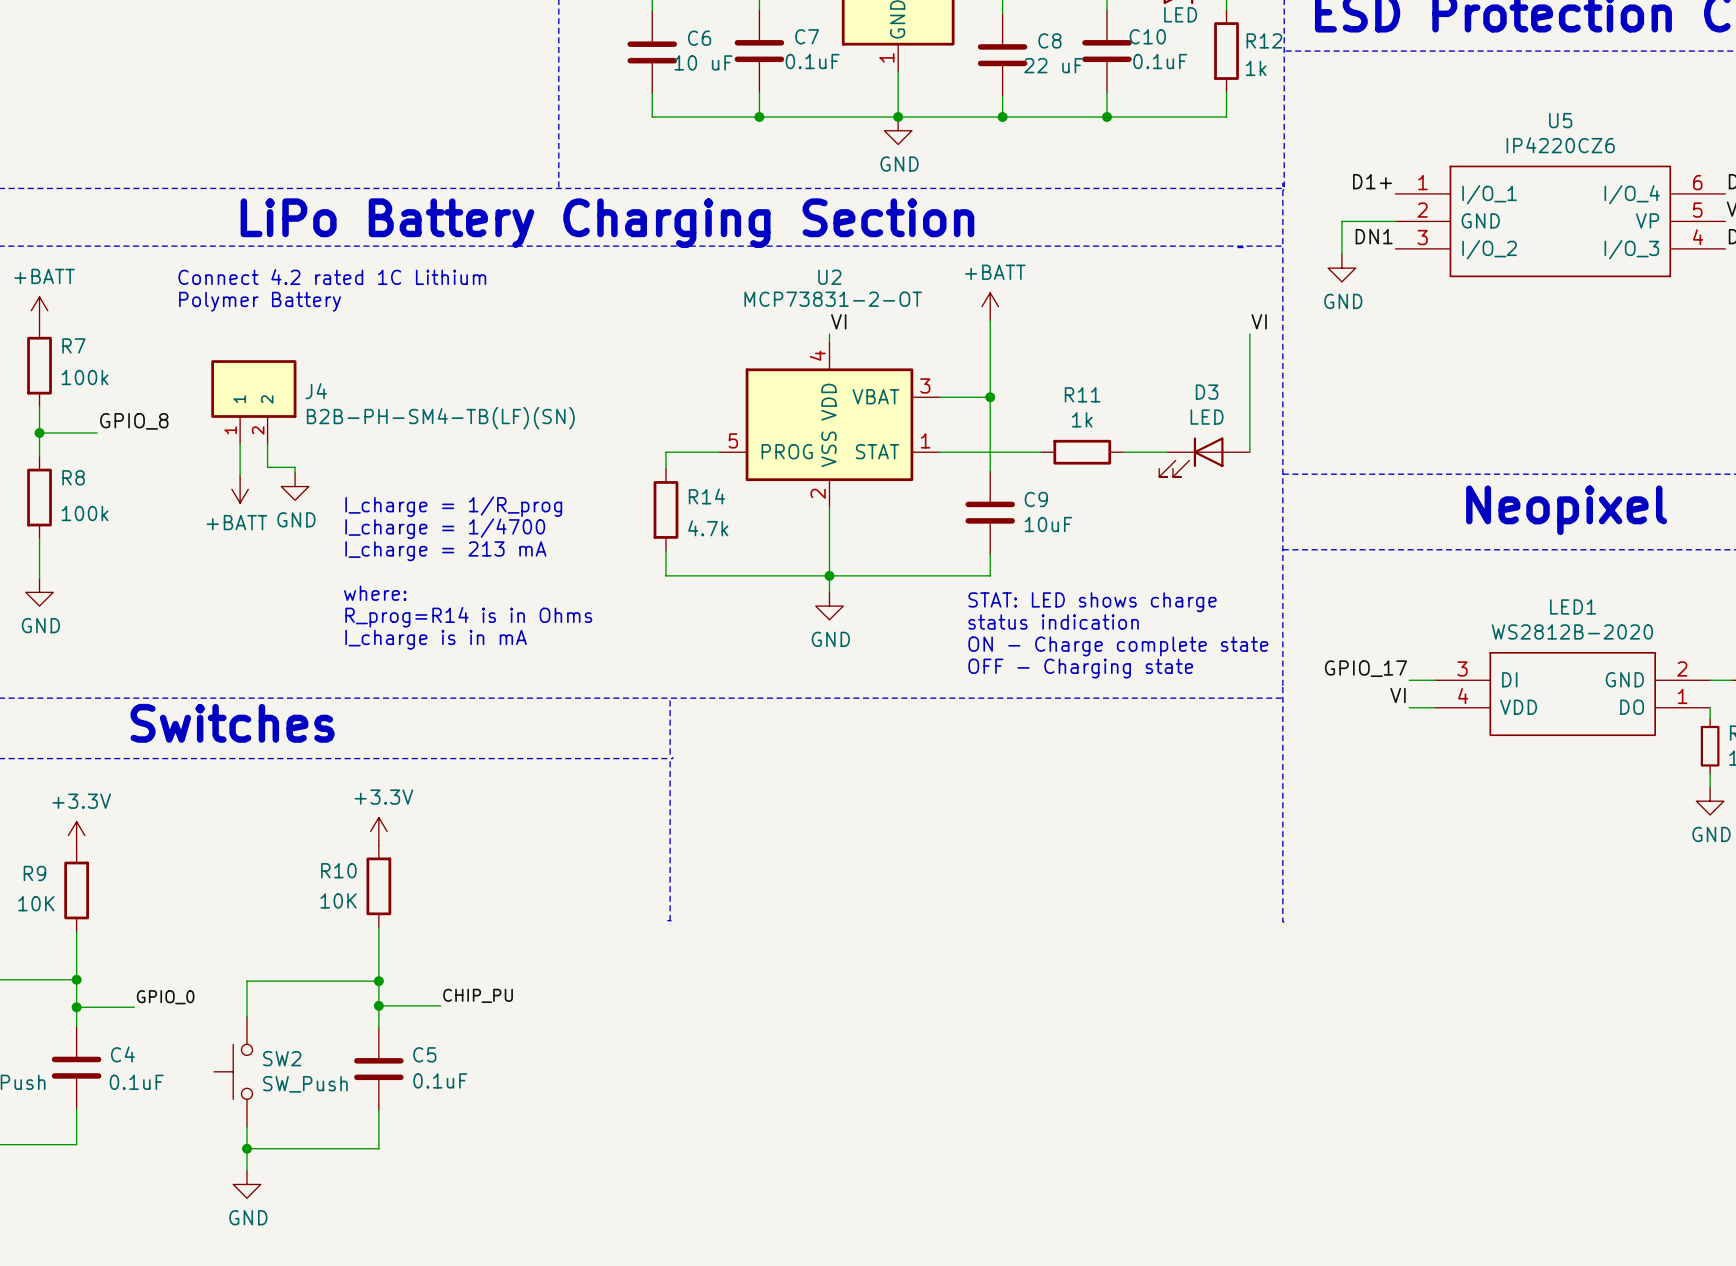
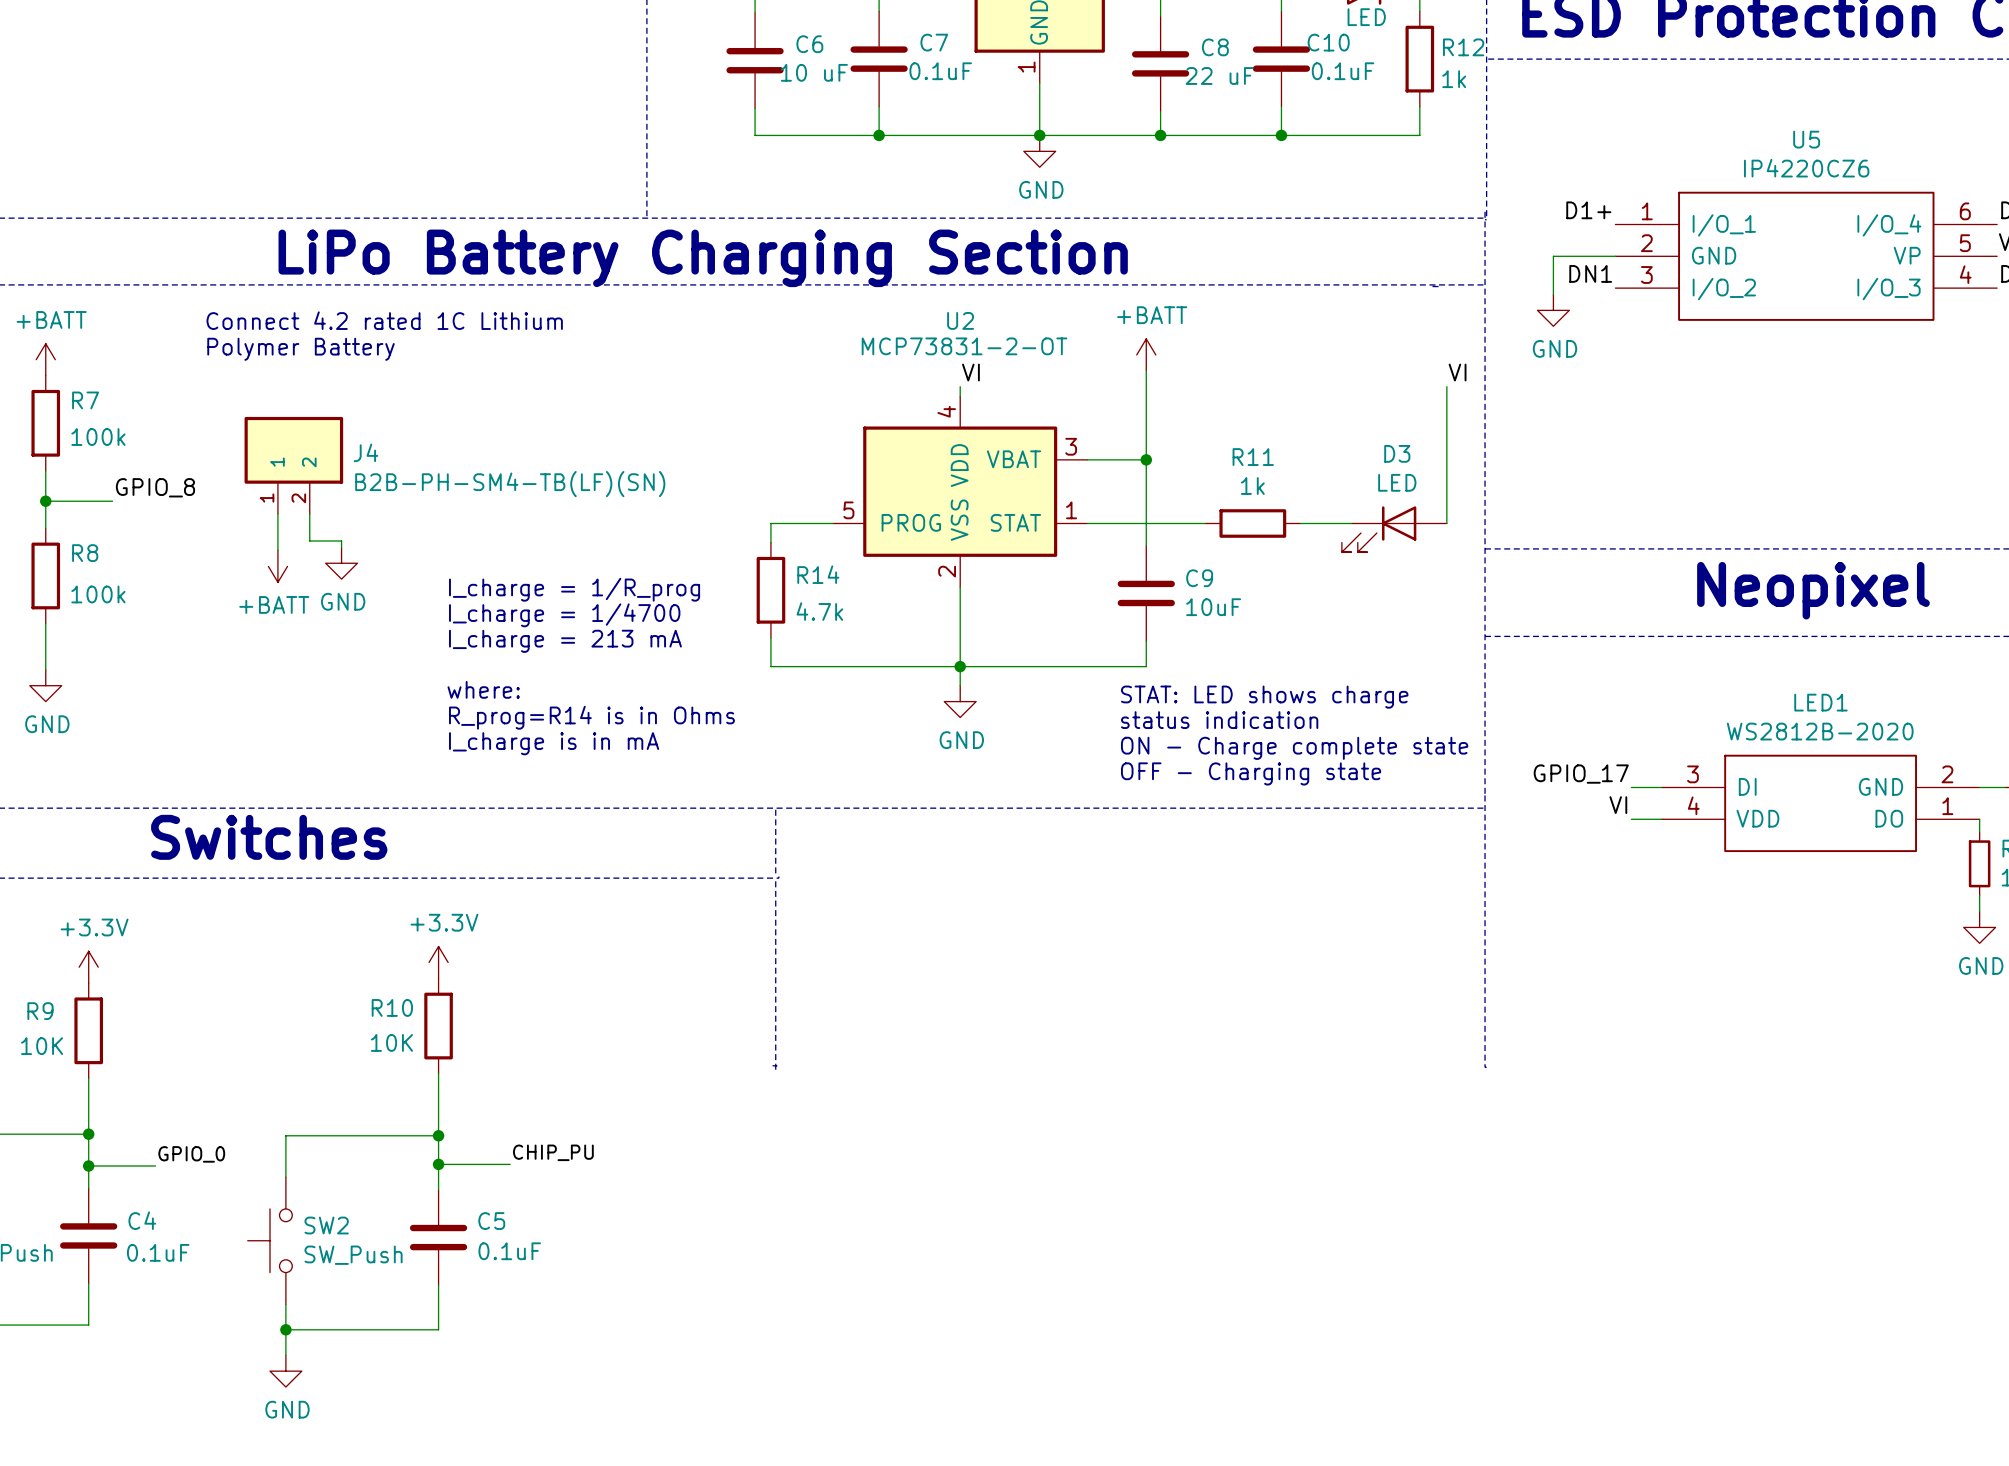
text position: I_charge = 1/R_prog (453, 506) -> I_charge = 1/R_prog (574, 589)
text position: I_charge = 1/4700 (445, 528) -> I_charge = 1/4700 (564, 615)
text position: I_charge = 213 mA (445, 551) -> I_charge = 213 mA (565, 641)
text position: where: (375, 593) -> where: (483, 689)
text position: R_prog=R14 is in Ohms (468, 617) -> R_prog=R14 is in Ohms (591, 717)
text position: I_charge is in mA (436, 639) -> I_charge is in mA (554, 743)

